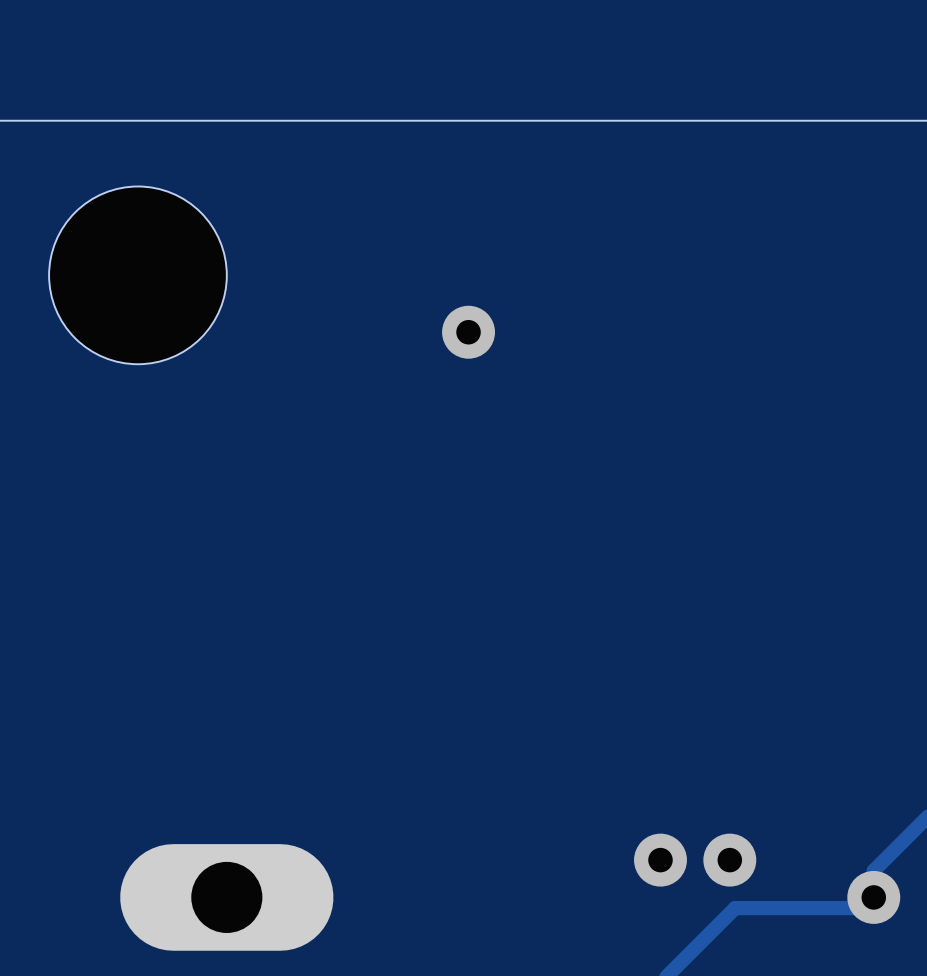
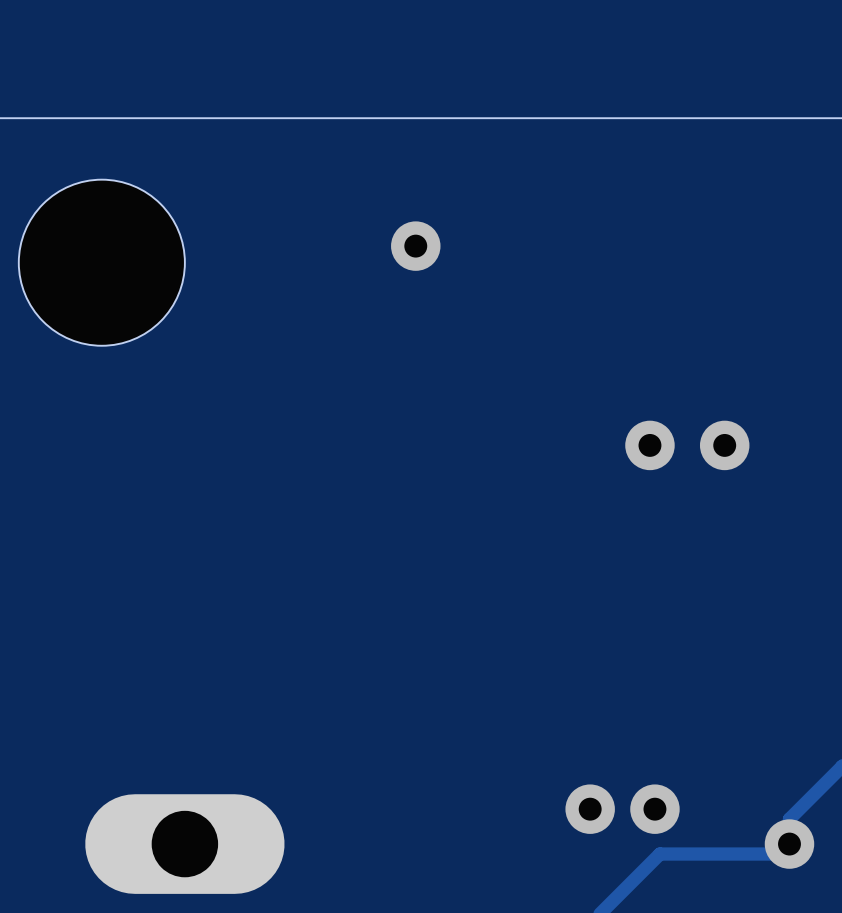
via position: (468, 332) -> (415, 246)
via: none -> (649, 445)
via: none -> (724, 445)

